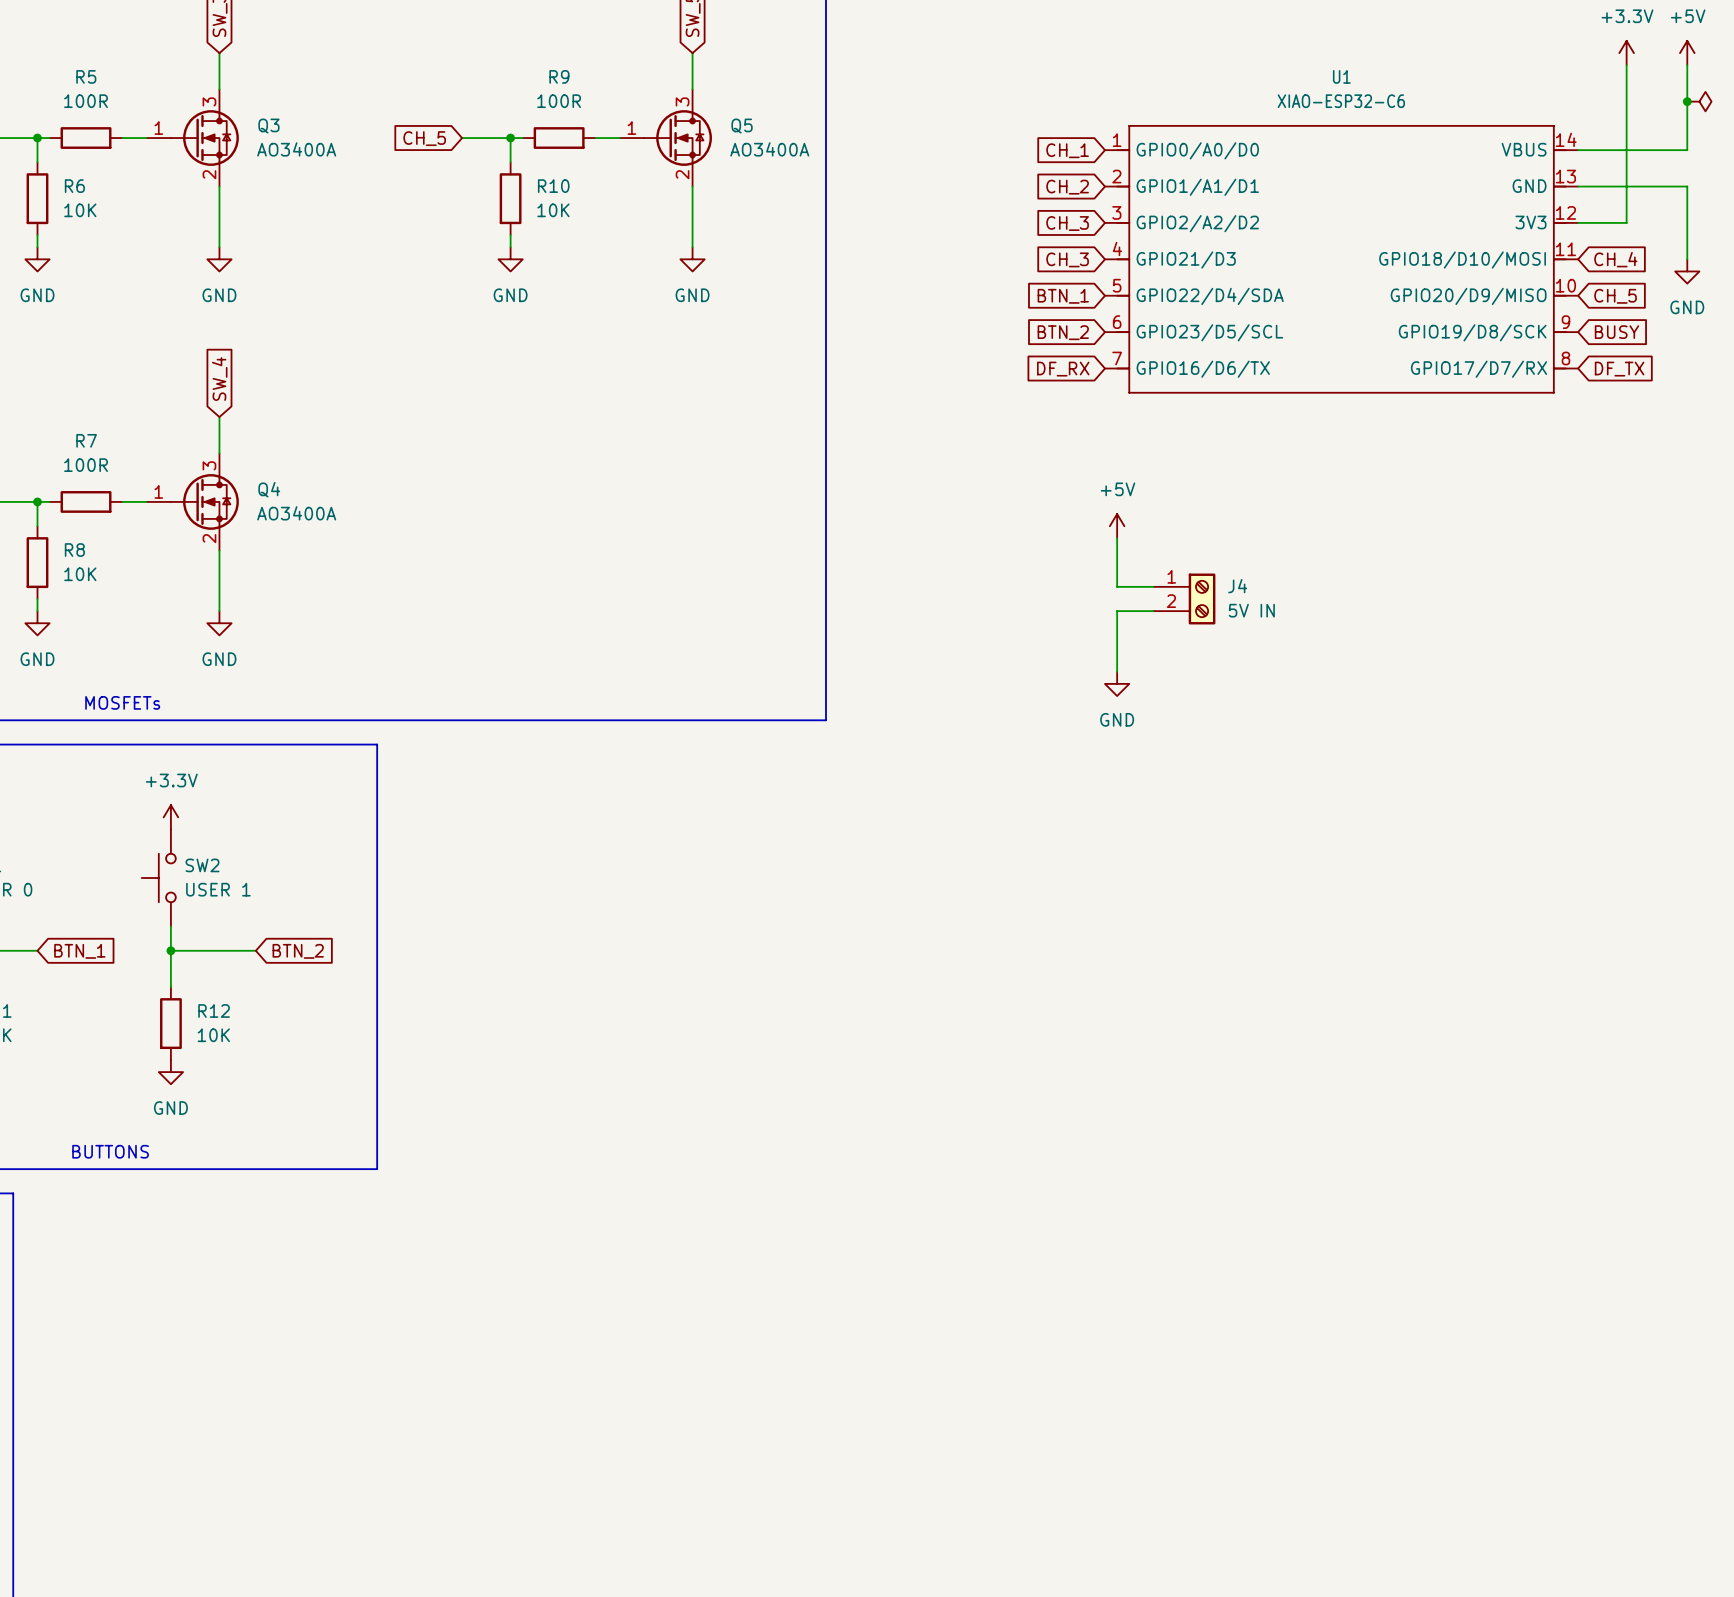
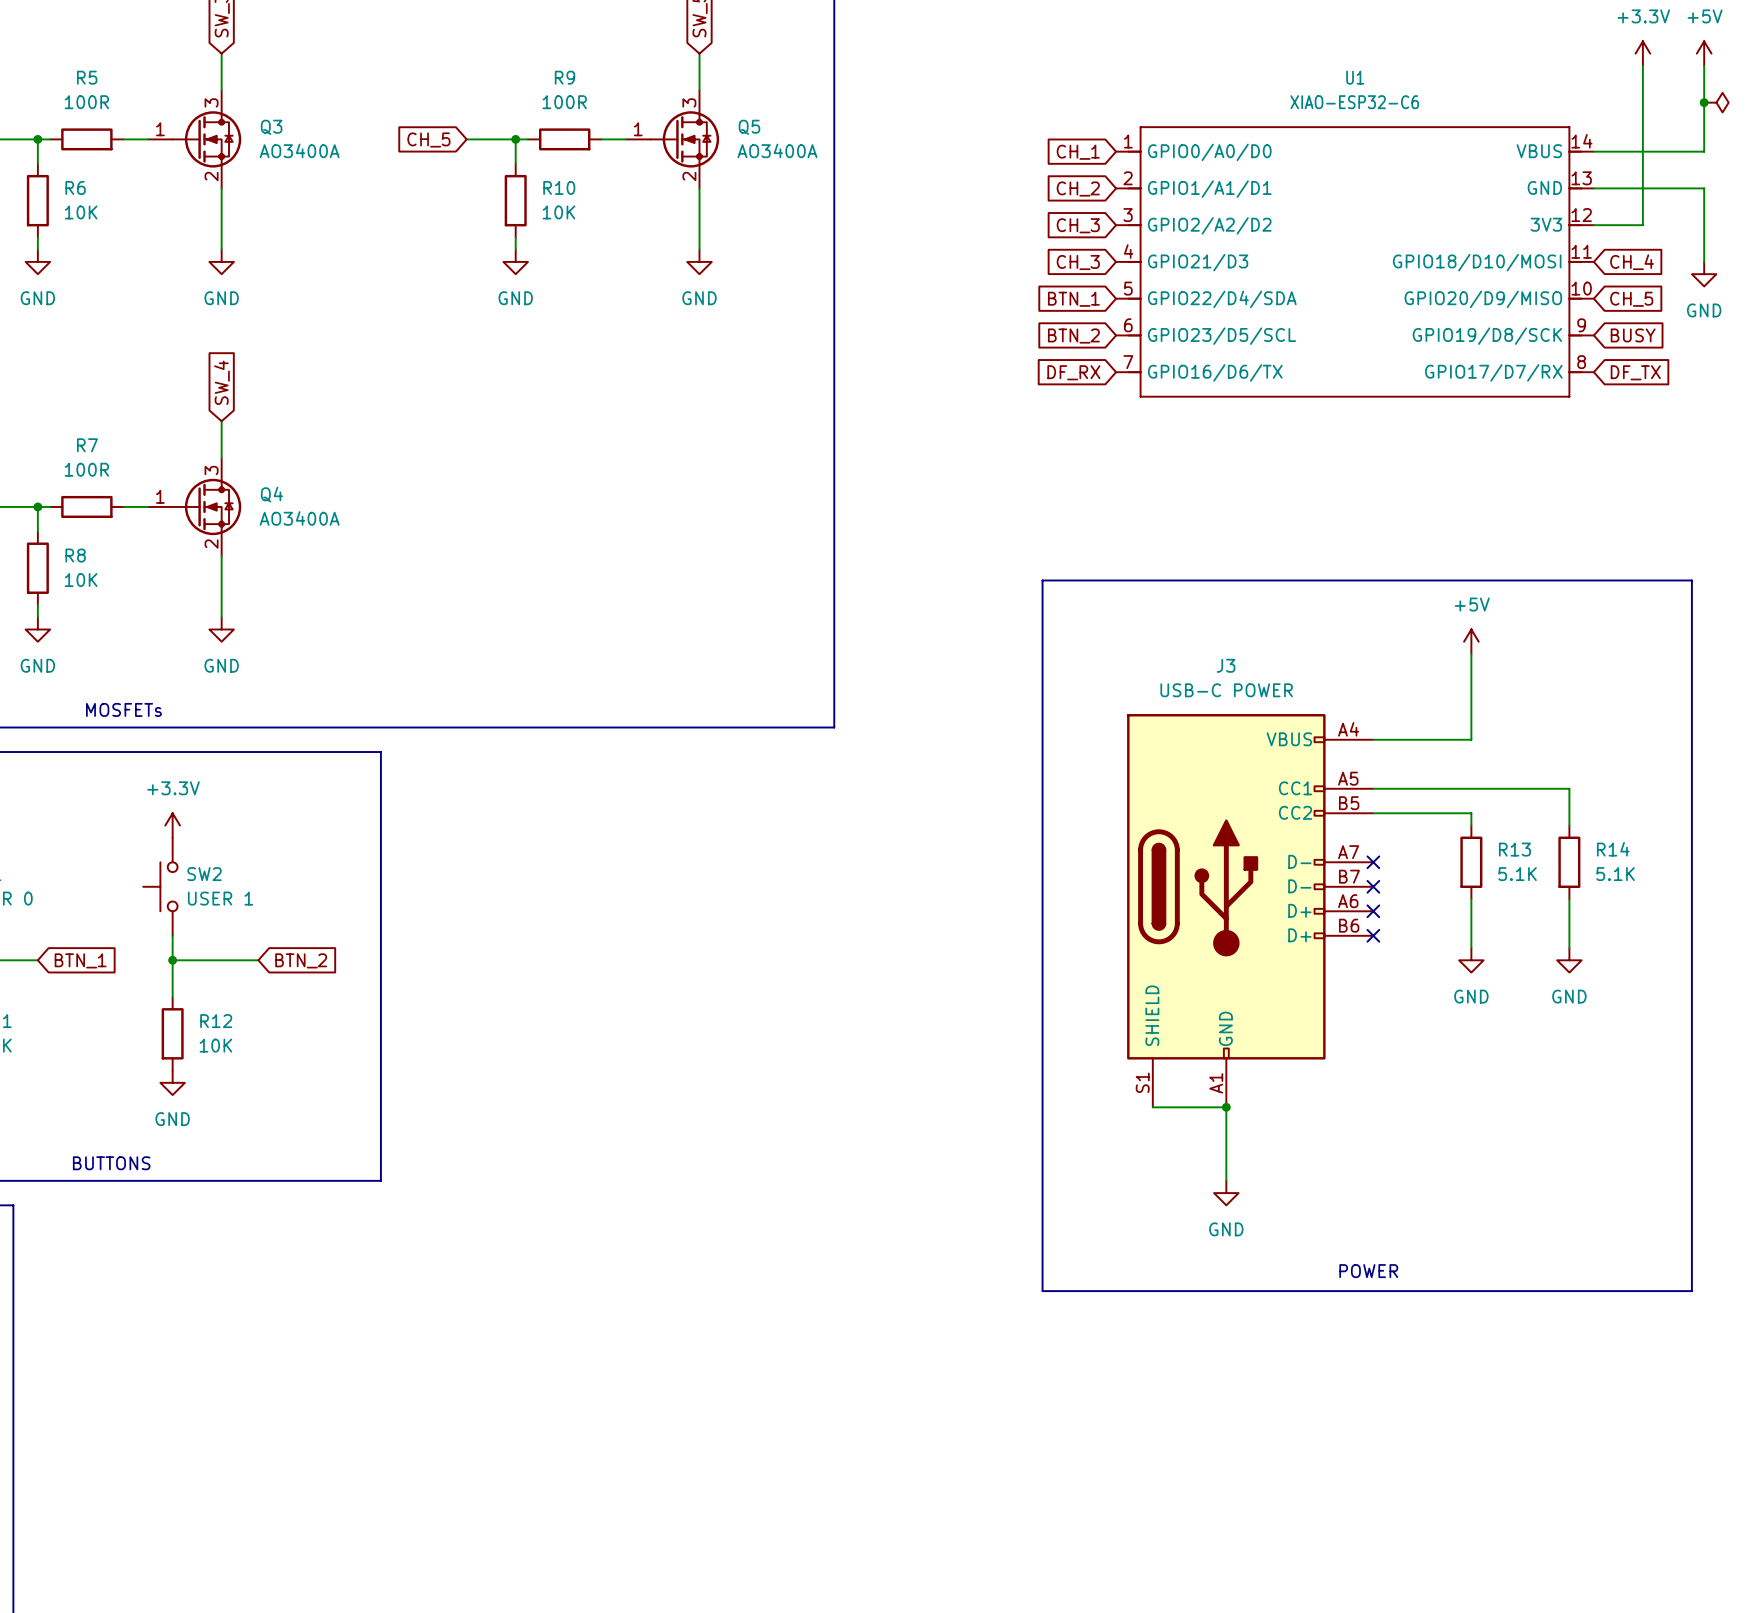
power symbol: +5V (1117, 526) -> none
wire: (1117, 538) (1117, 586) (1153, 586) -> none
line: none -> (1042, 580) (1691, 580) (1691, 1291) (1042, 1291) (1042, 580)
J4: 5V IN (1184, 598) -> none
wire: (1153, 611) (1117, 611) (1117, 671) -> none
power symbol: none -> +5V (1471, 641)
wire: none -> (1471, 653) (1471, 739) (1373, 739)
power symbol: GND (1117, 683) -> none
wire: none -> (1373, 788) (1569, 788) (1569, 825)
wire: none -> (1373, 813) (1471, 813) (1471, 825)
no-connect mark: none -> (1373, 862)
R13: none -> 5.1K (1471, 862)
R14: none -> 5.1K (1569, 862)
no-connect mark: none -> (1373, 886)
wire: none -> (1471, 899) (1471, 948)
wire: none -> (1569, 899) (1569, 948)
J3: none -> USB-C POWER (1250, 910)
no-connect mark: none -> (1373, 911)
no-connect mark: none -> (1373, 935)
power symbol: none -> GND (1471, 960)
power symbol: none -> GND (1569, 960)
wire: none -> (1152, 1107) (1226, 1107) (1226, 1180)
junction: none -> (1226, 1107)
power symbol: none -> GND (1226, 1193)
text: none -> POWER (1368, 1271)

